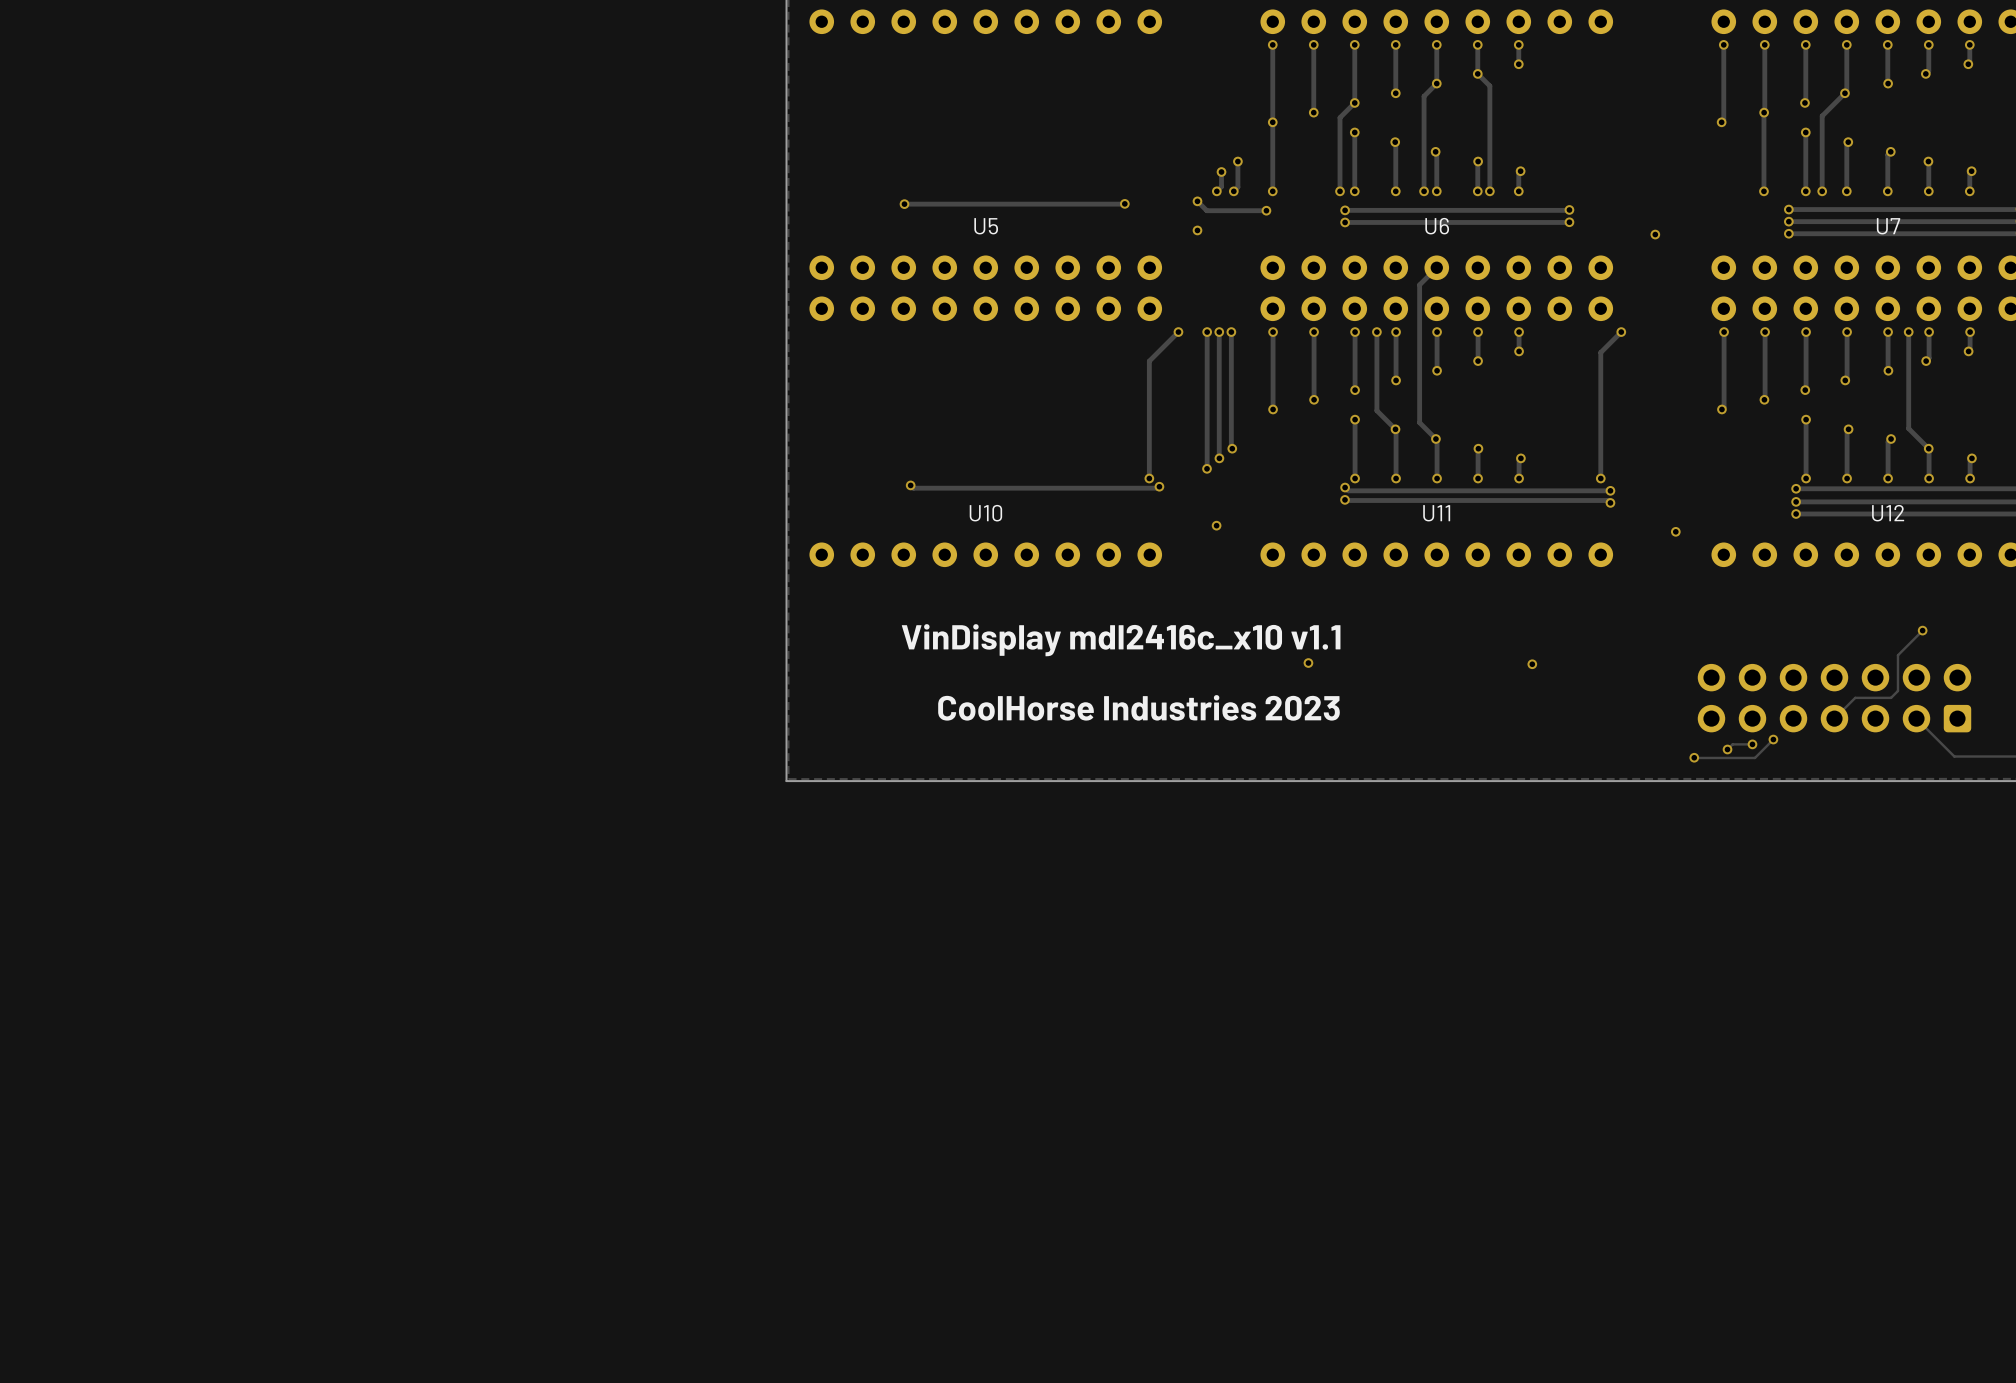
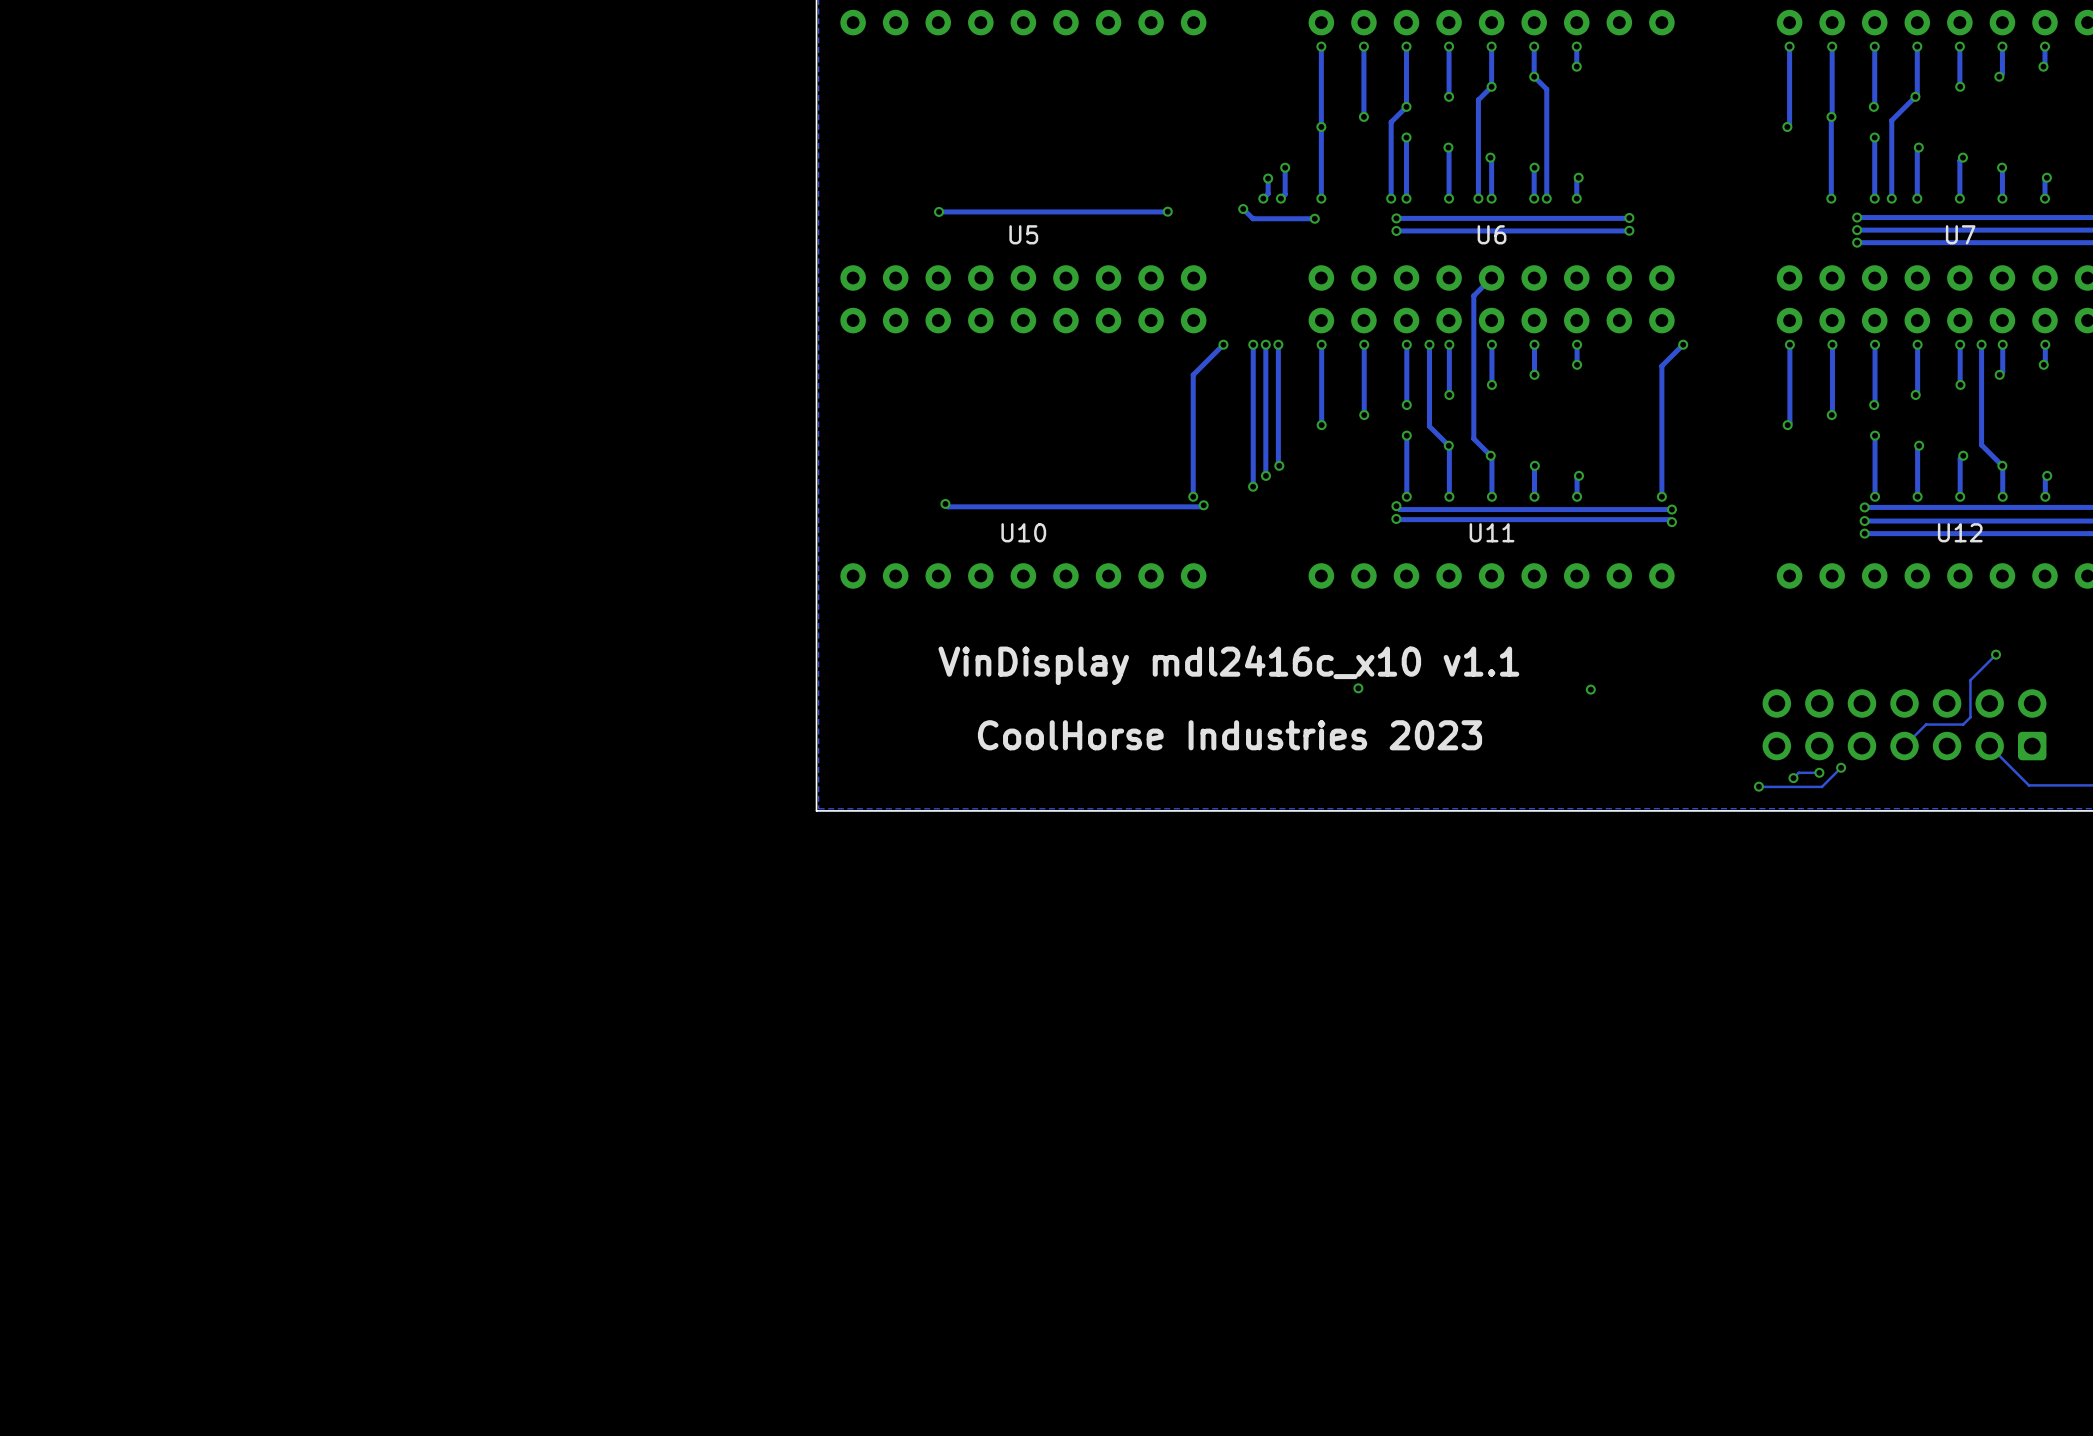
via: (1197, 230) -> none
via: (1655, 234) -> none
via: (1216, 525) -> none
via: (1675, 531) -> none

